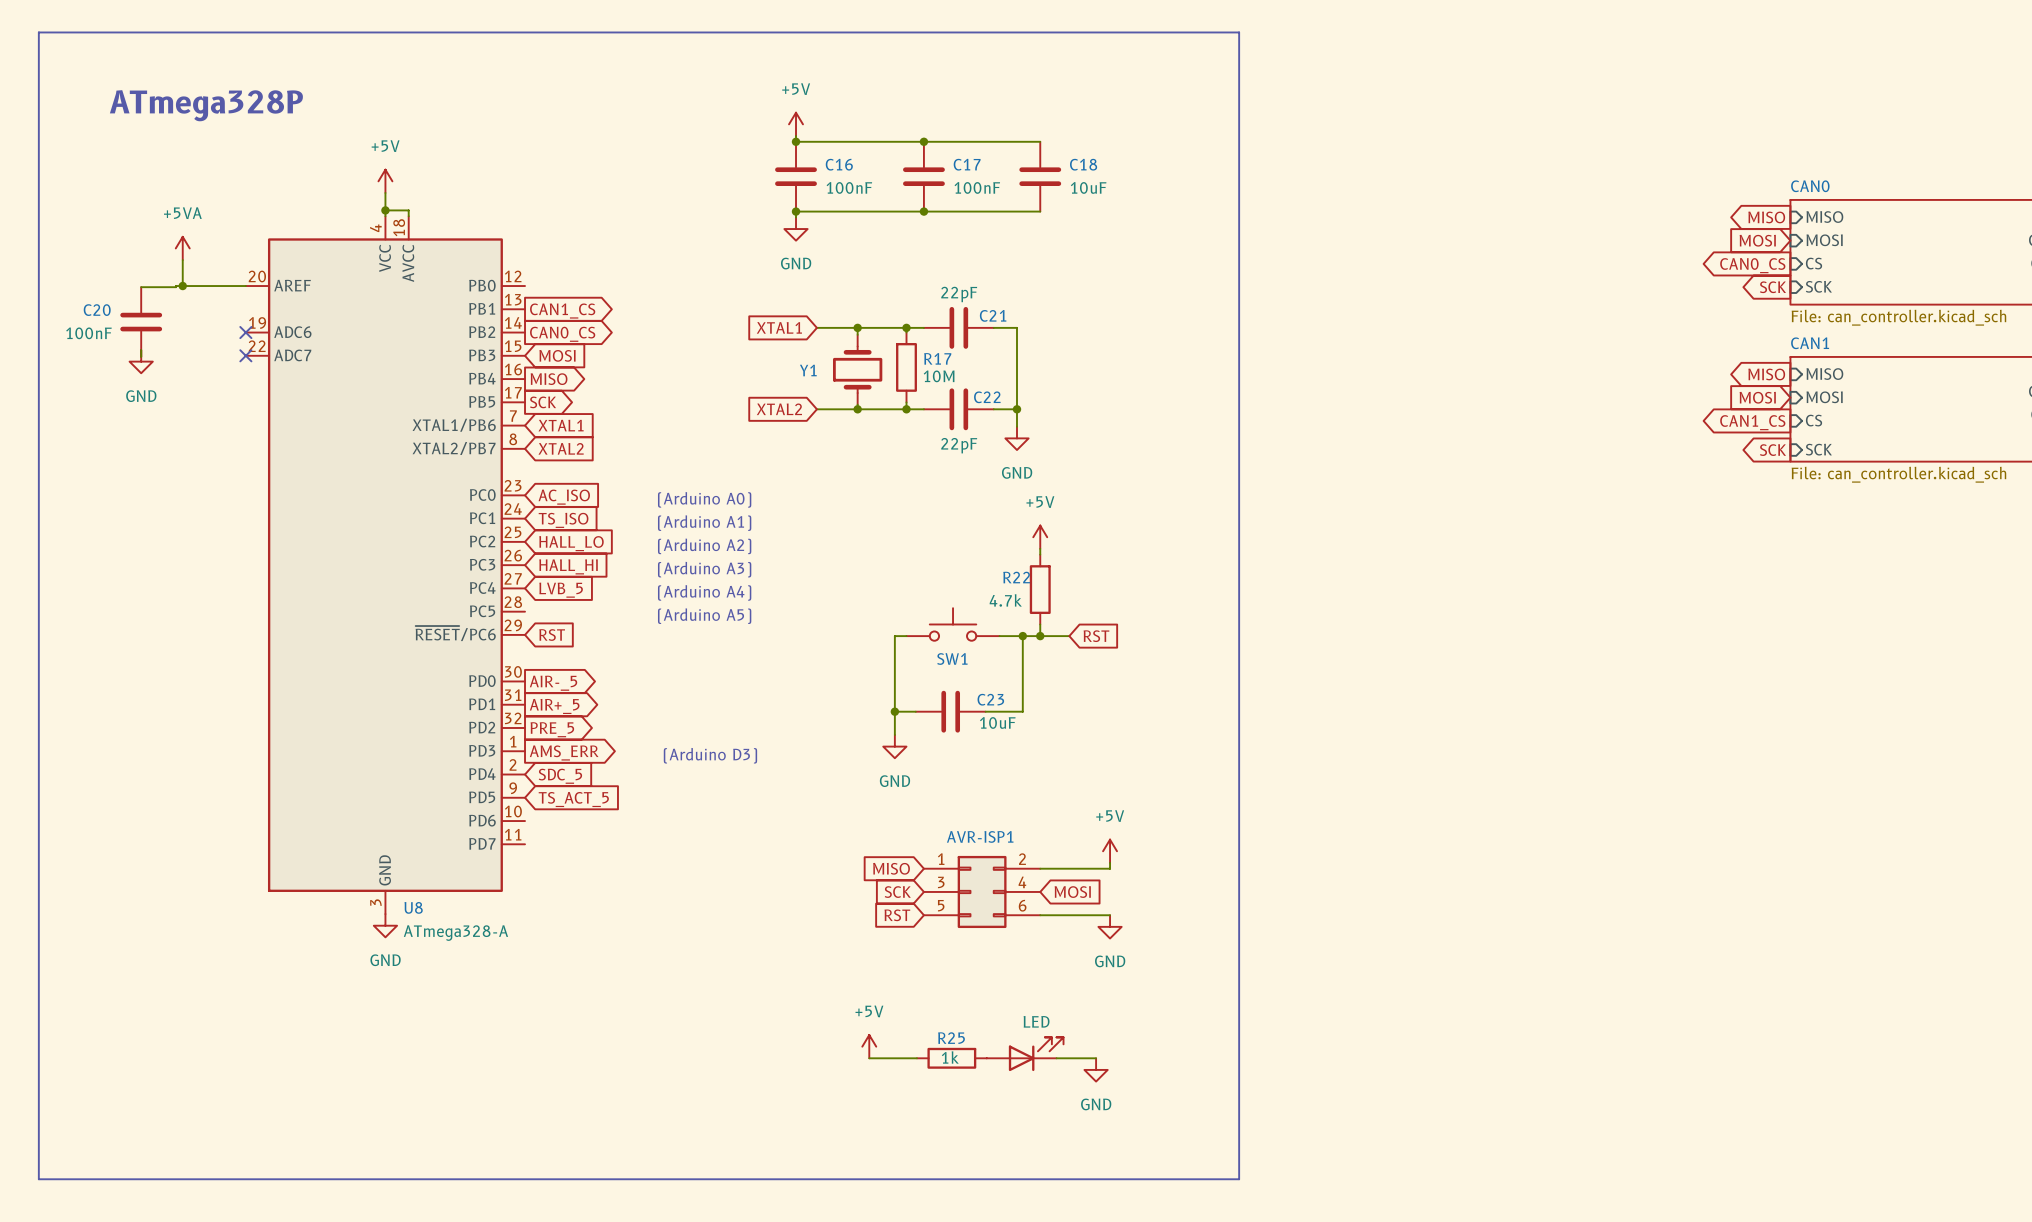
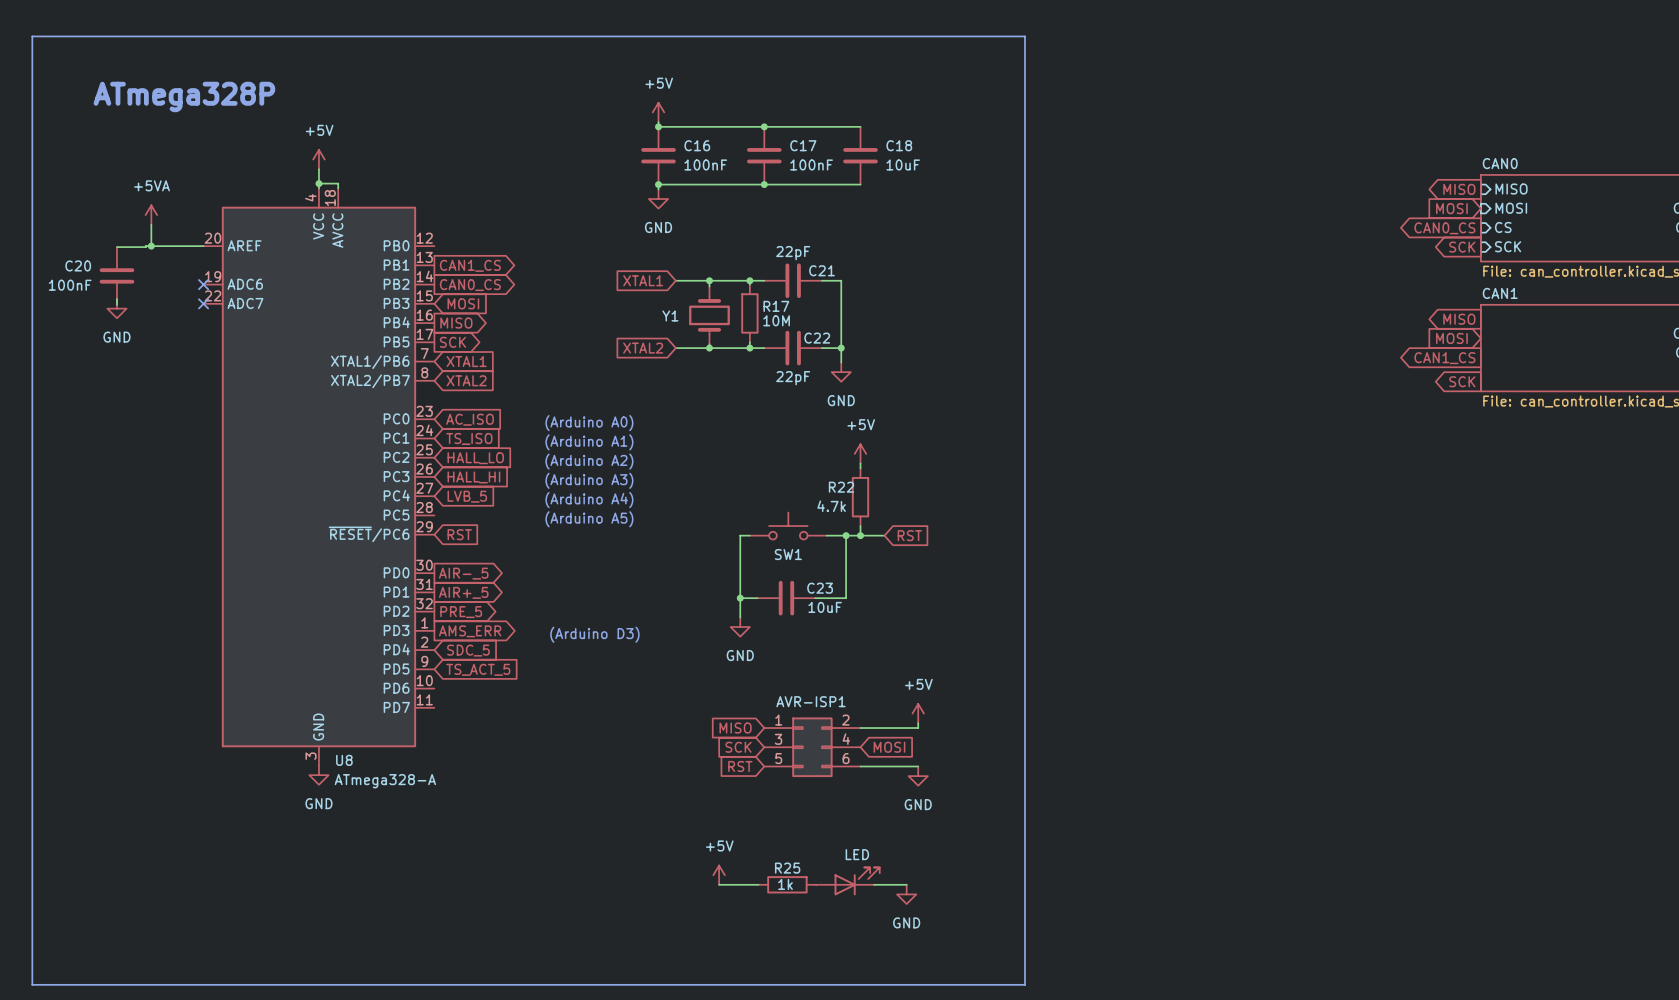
sheet pin: MISO (1824, 374) -> none
sheet pin: MOSI (1824, 397) -> none
sheet pin: CS (1814, 420) -> none
sheet pin: SCK (1818, 449) -> none

